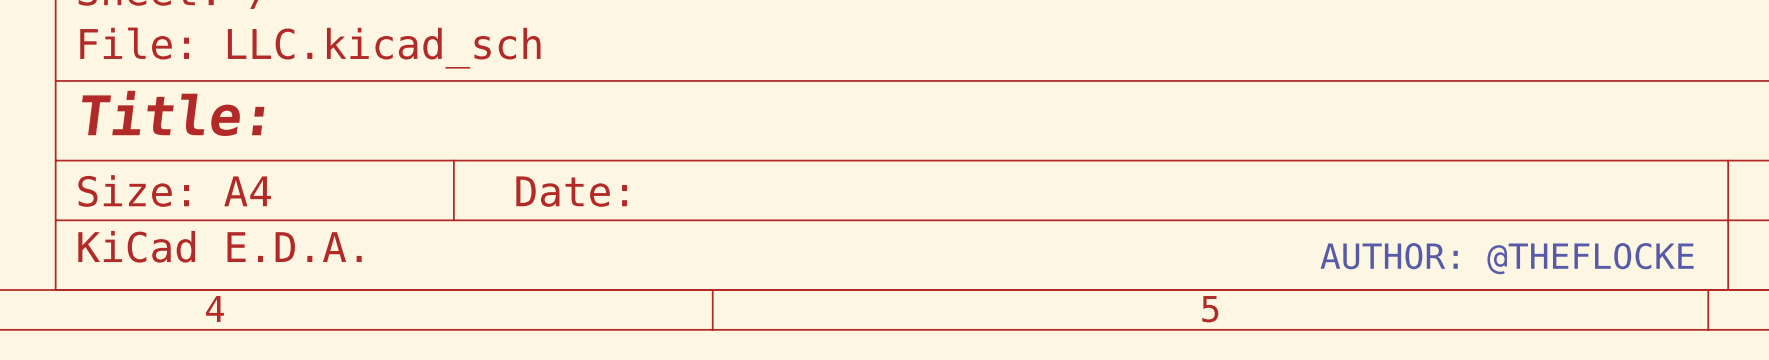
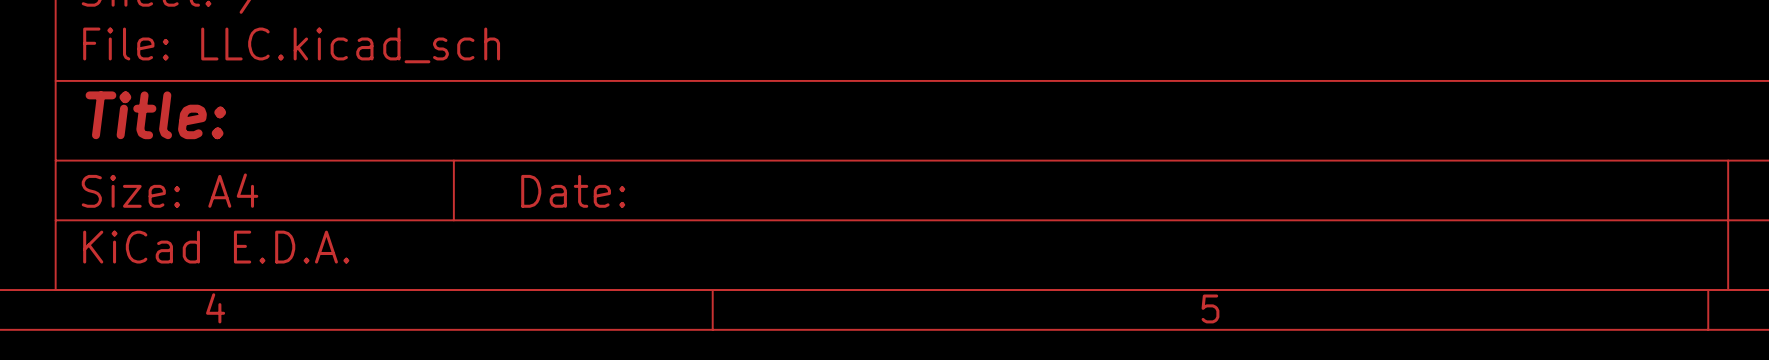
text: AUTHOR: @THEFLOCKE (1507, 258) -> none

